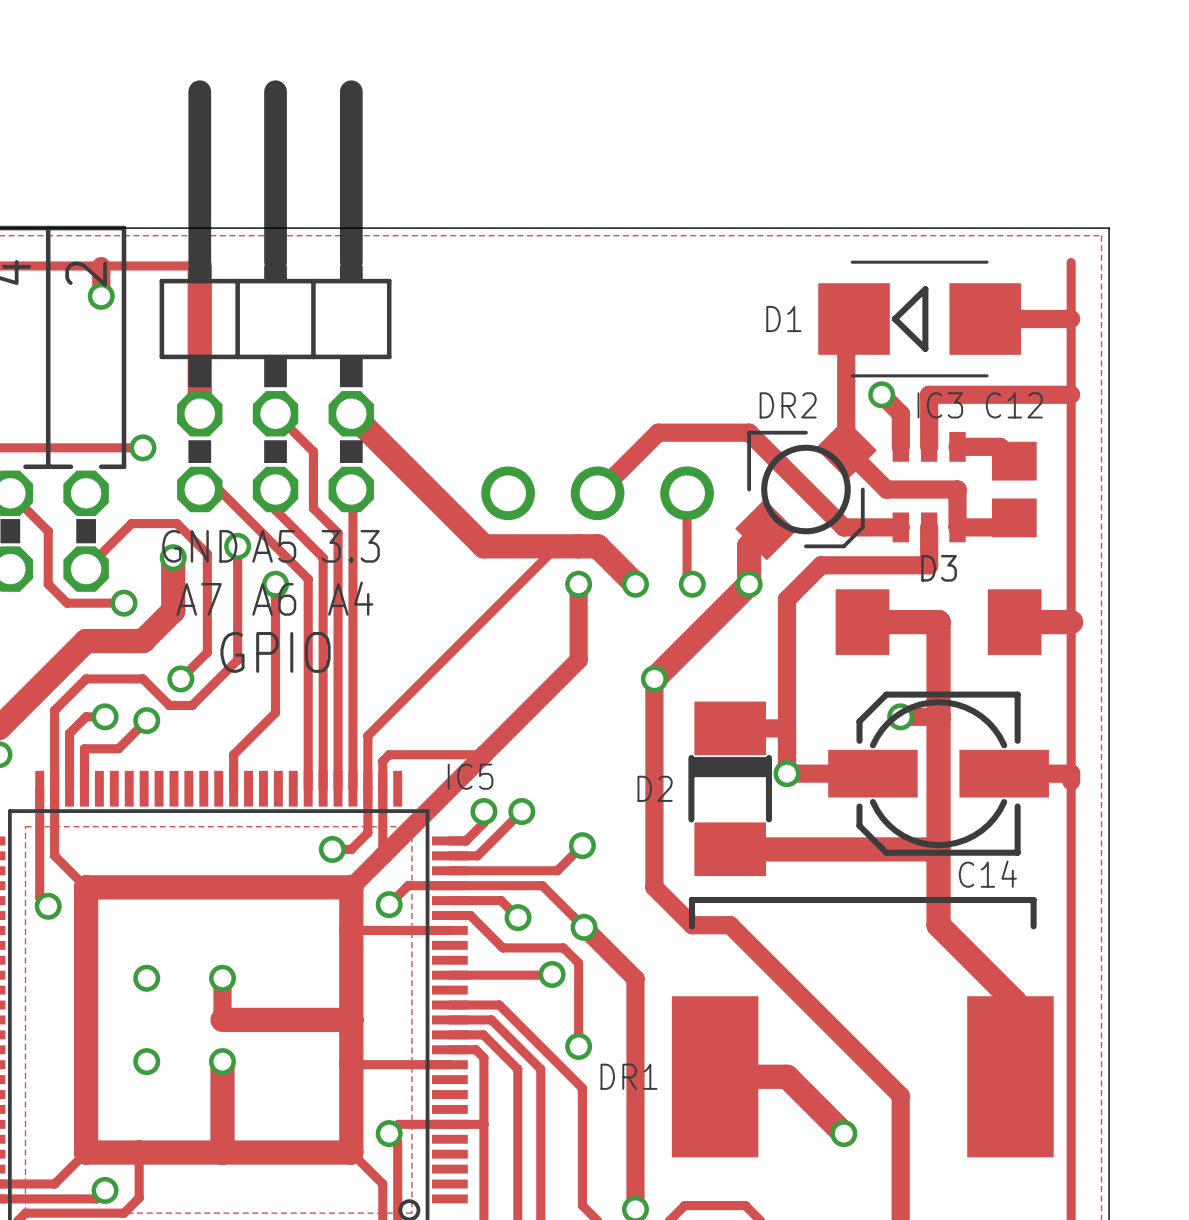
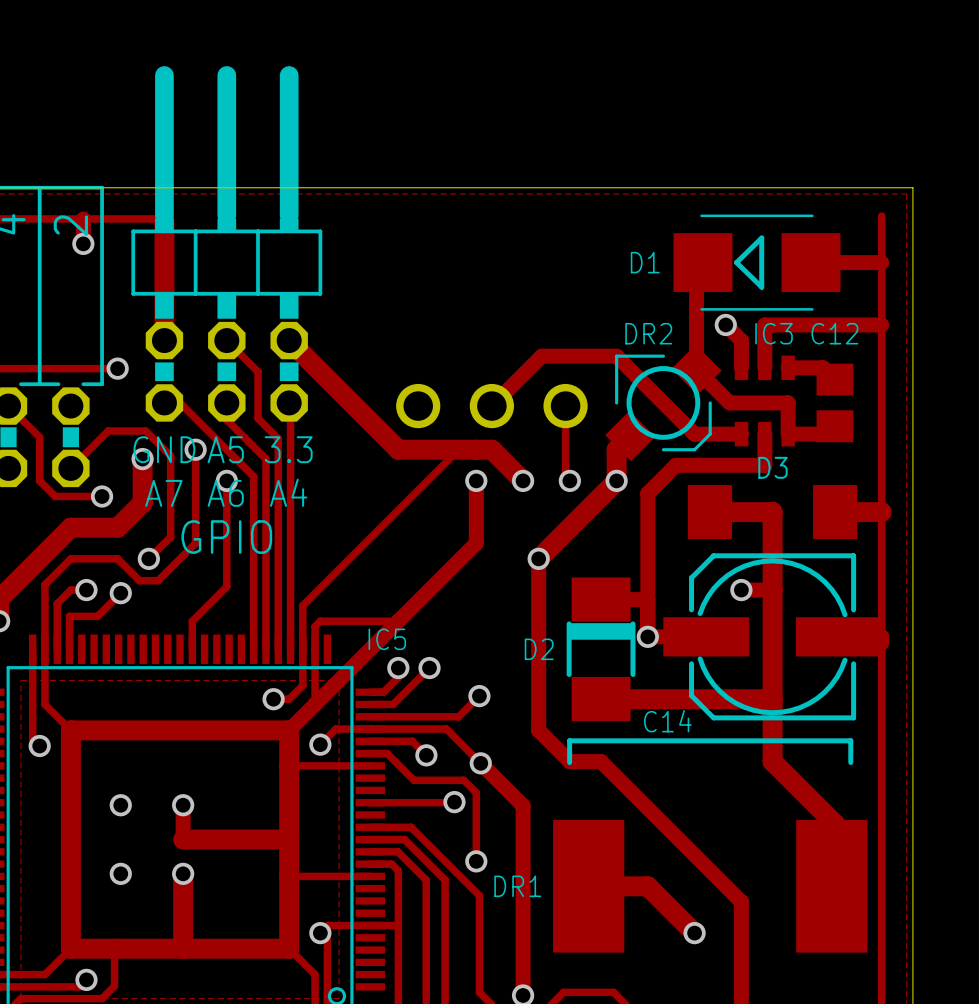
C14 footprint: [828, 691, 1049, 856] -> [663, 553, 882, 721]
C14 name position: C14 (987, 874) -> C14 (667, 721)

